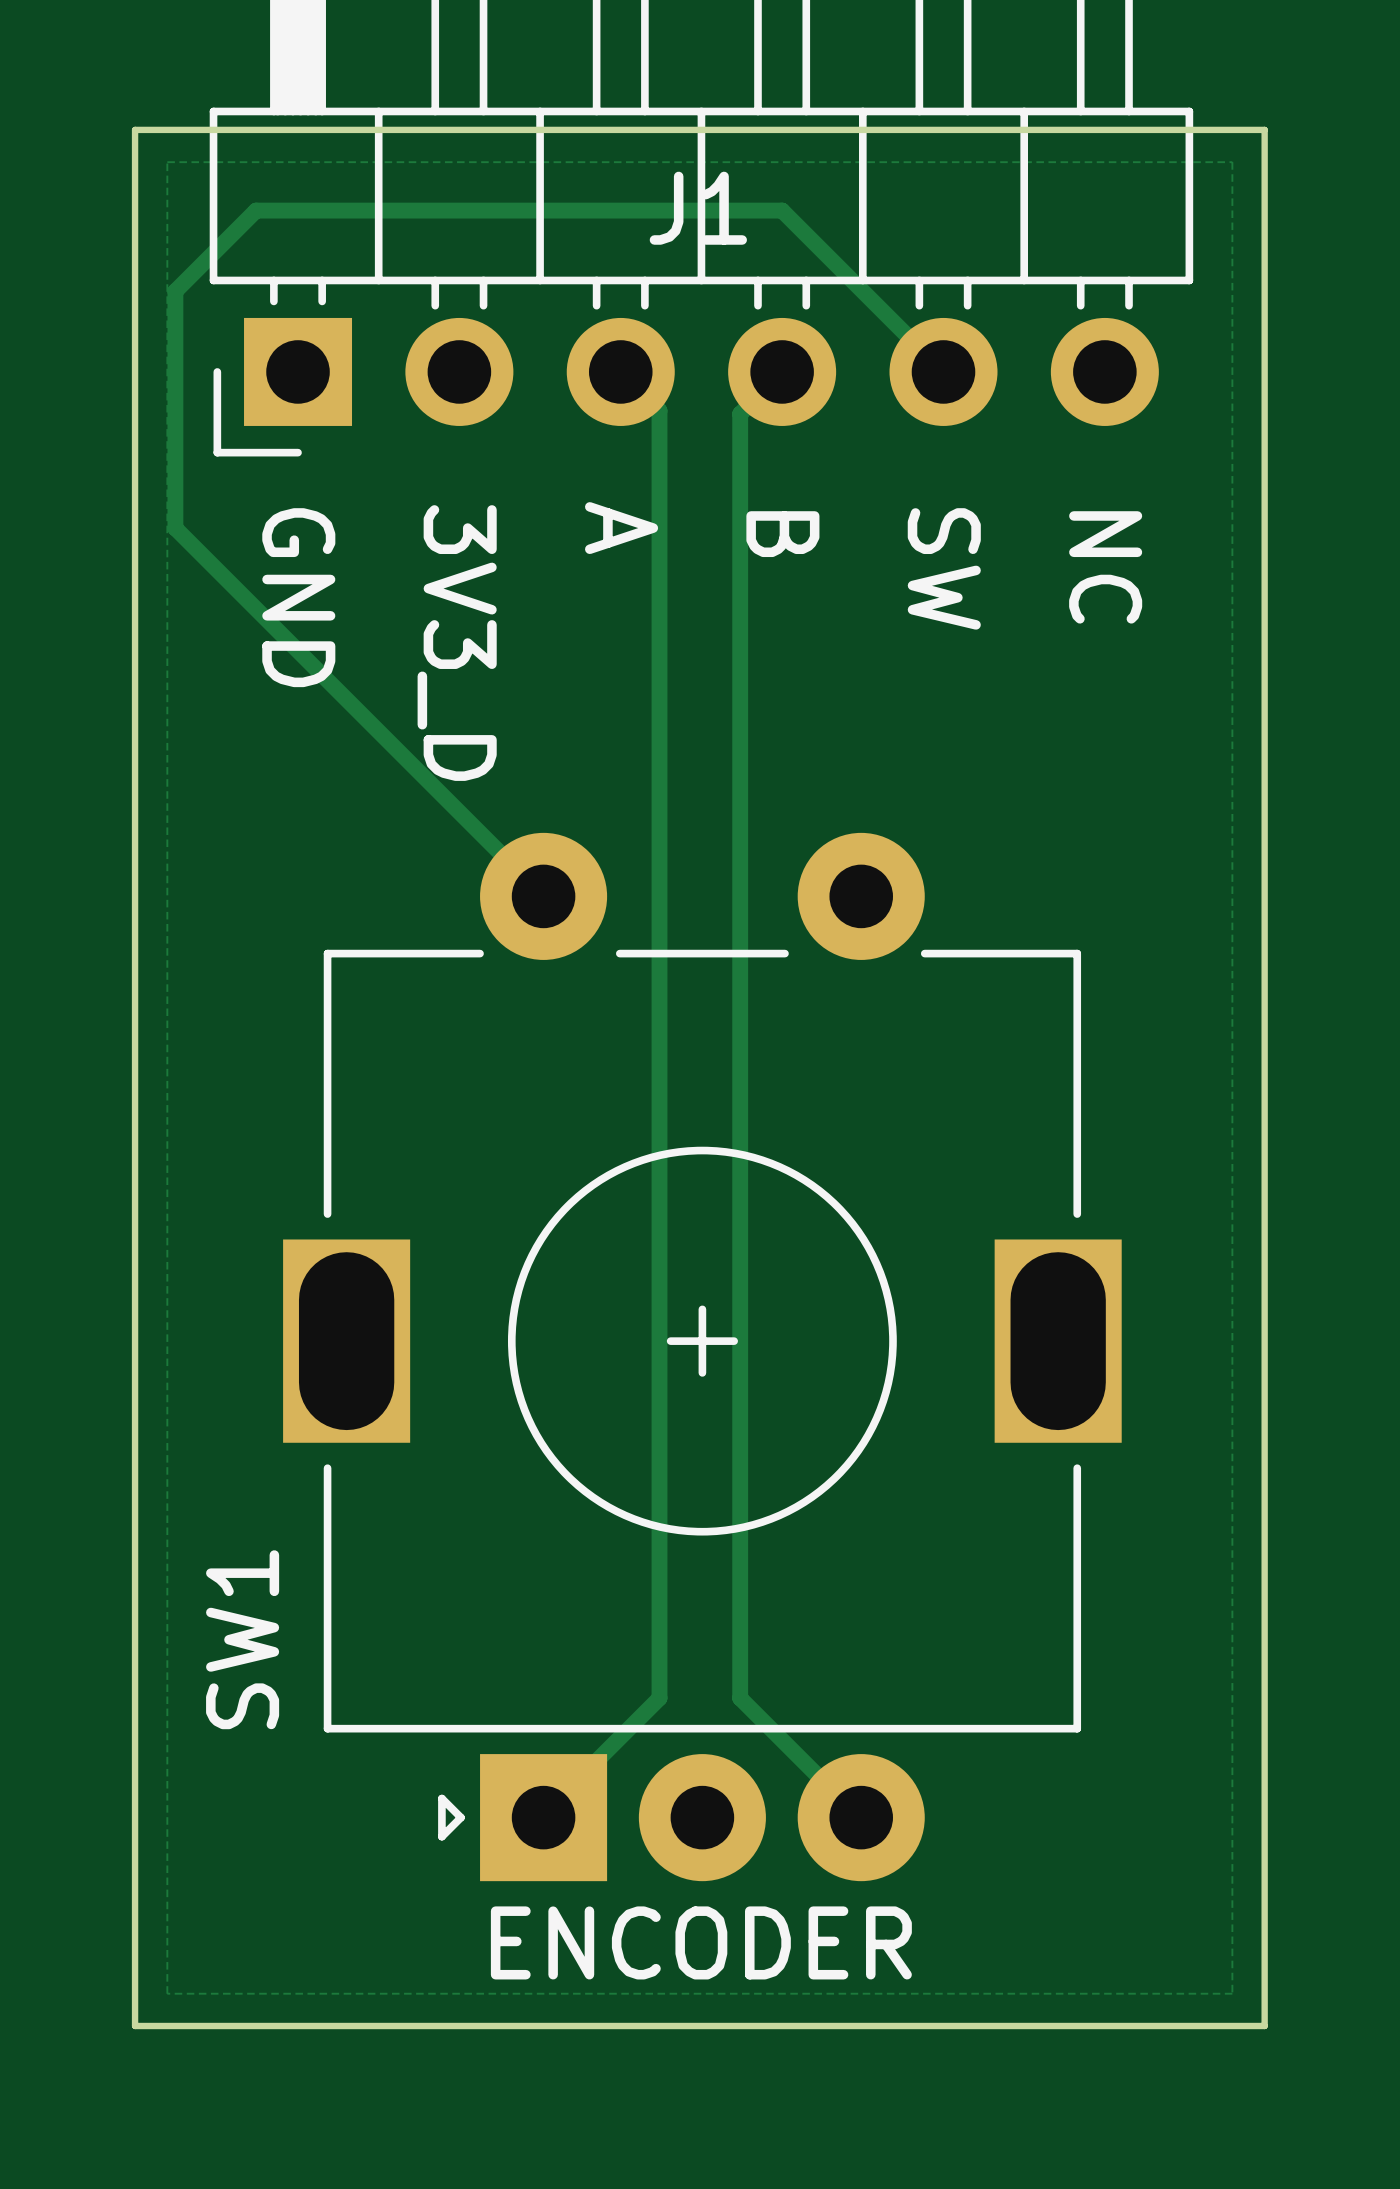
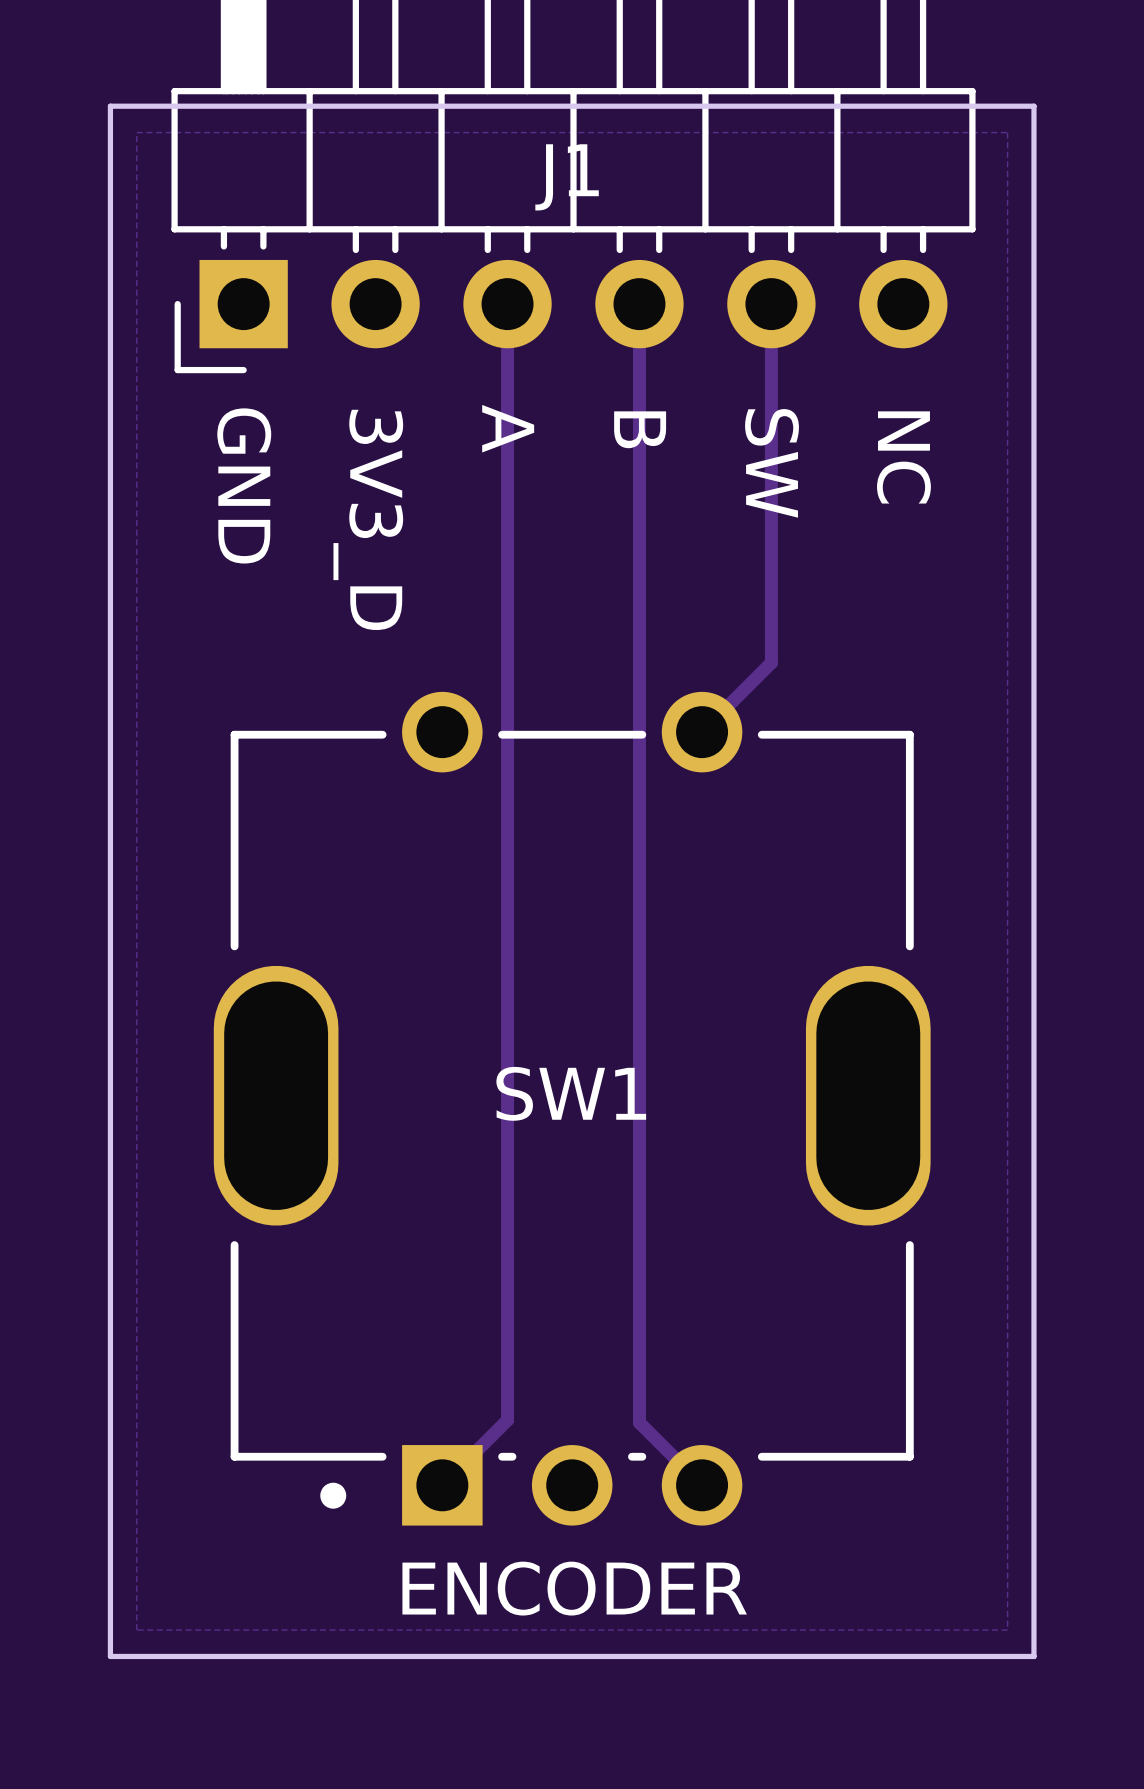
track: (620, 371) (659, 410) (659, 1698) (620, 1736) -> (507, 304) (507, 1420)
track: (782, 371) (740, 413) (740, 1698) (782, 1740) -> (639, 304) (639, 1422)
track: (943, 371) (782, 210) (256, 210) (175, 291) (175, 528) (543, 896) -> (771, 304) (771, 662) (702, 732)
SW1 footprint: [283, 832, 1122, 1882] -> [213, 691, 931, 1526]
SW1 name position: SW1 (242, 1639) -> SW1 (571, 1093)

